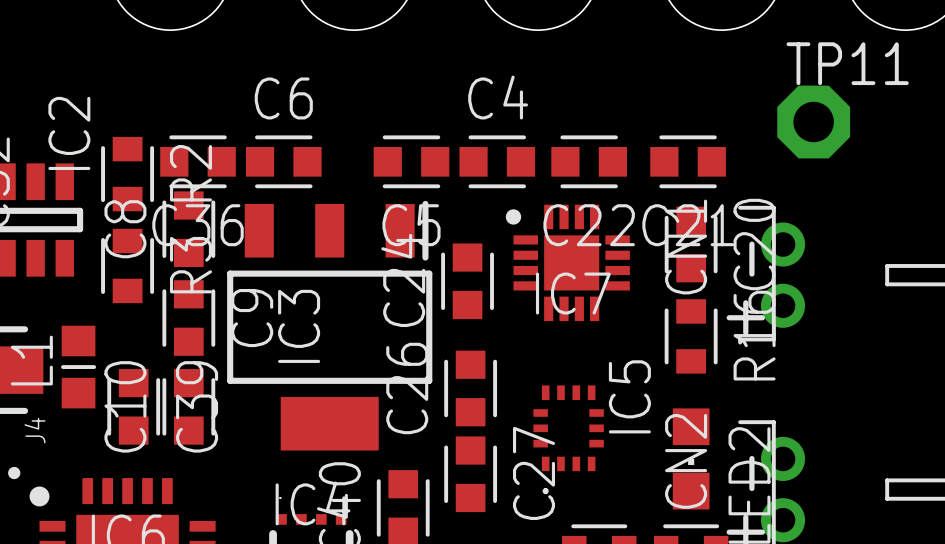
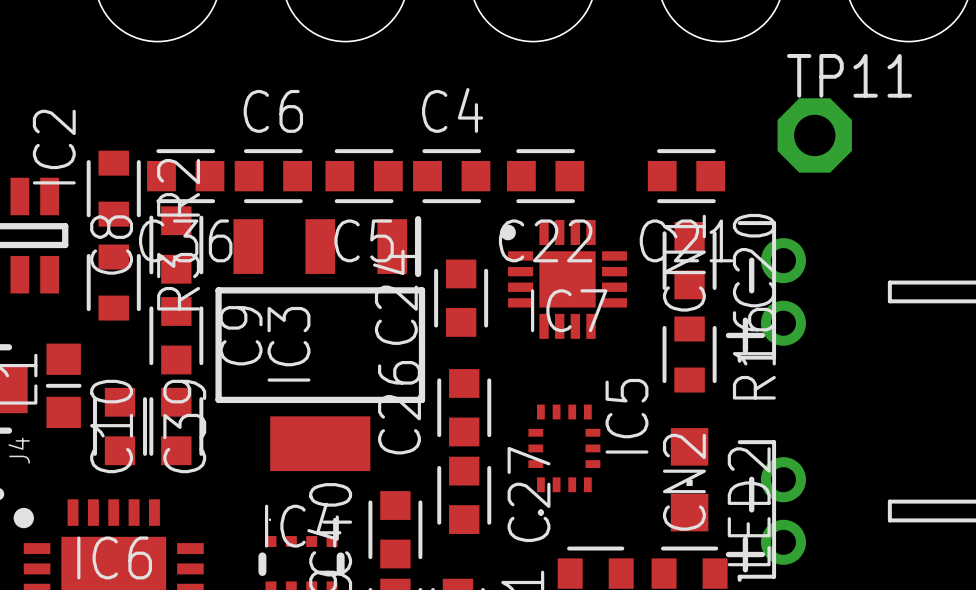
C5 position: (411, 161) -> (364, 176)
C4 position: (497, 161) -> (451, 176)
C22 position: (589, 161) -> (545, 176)

